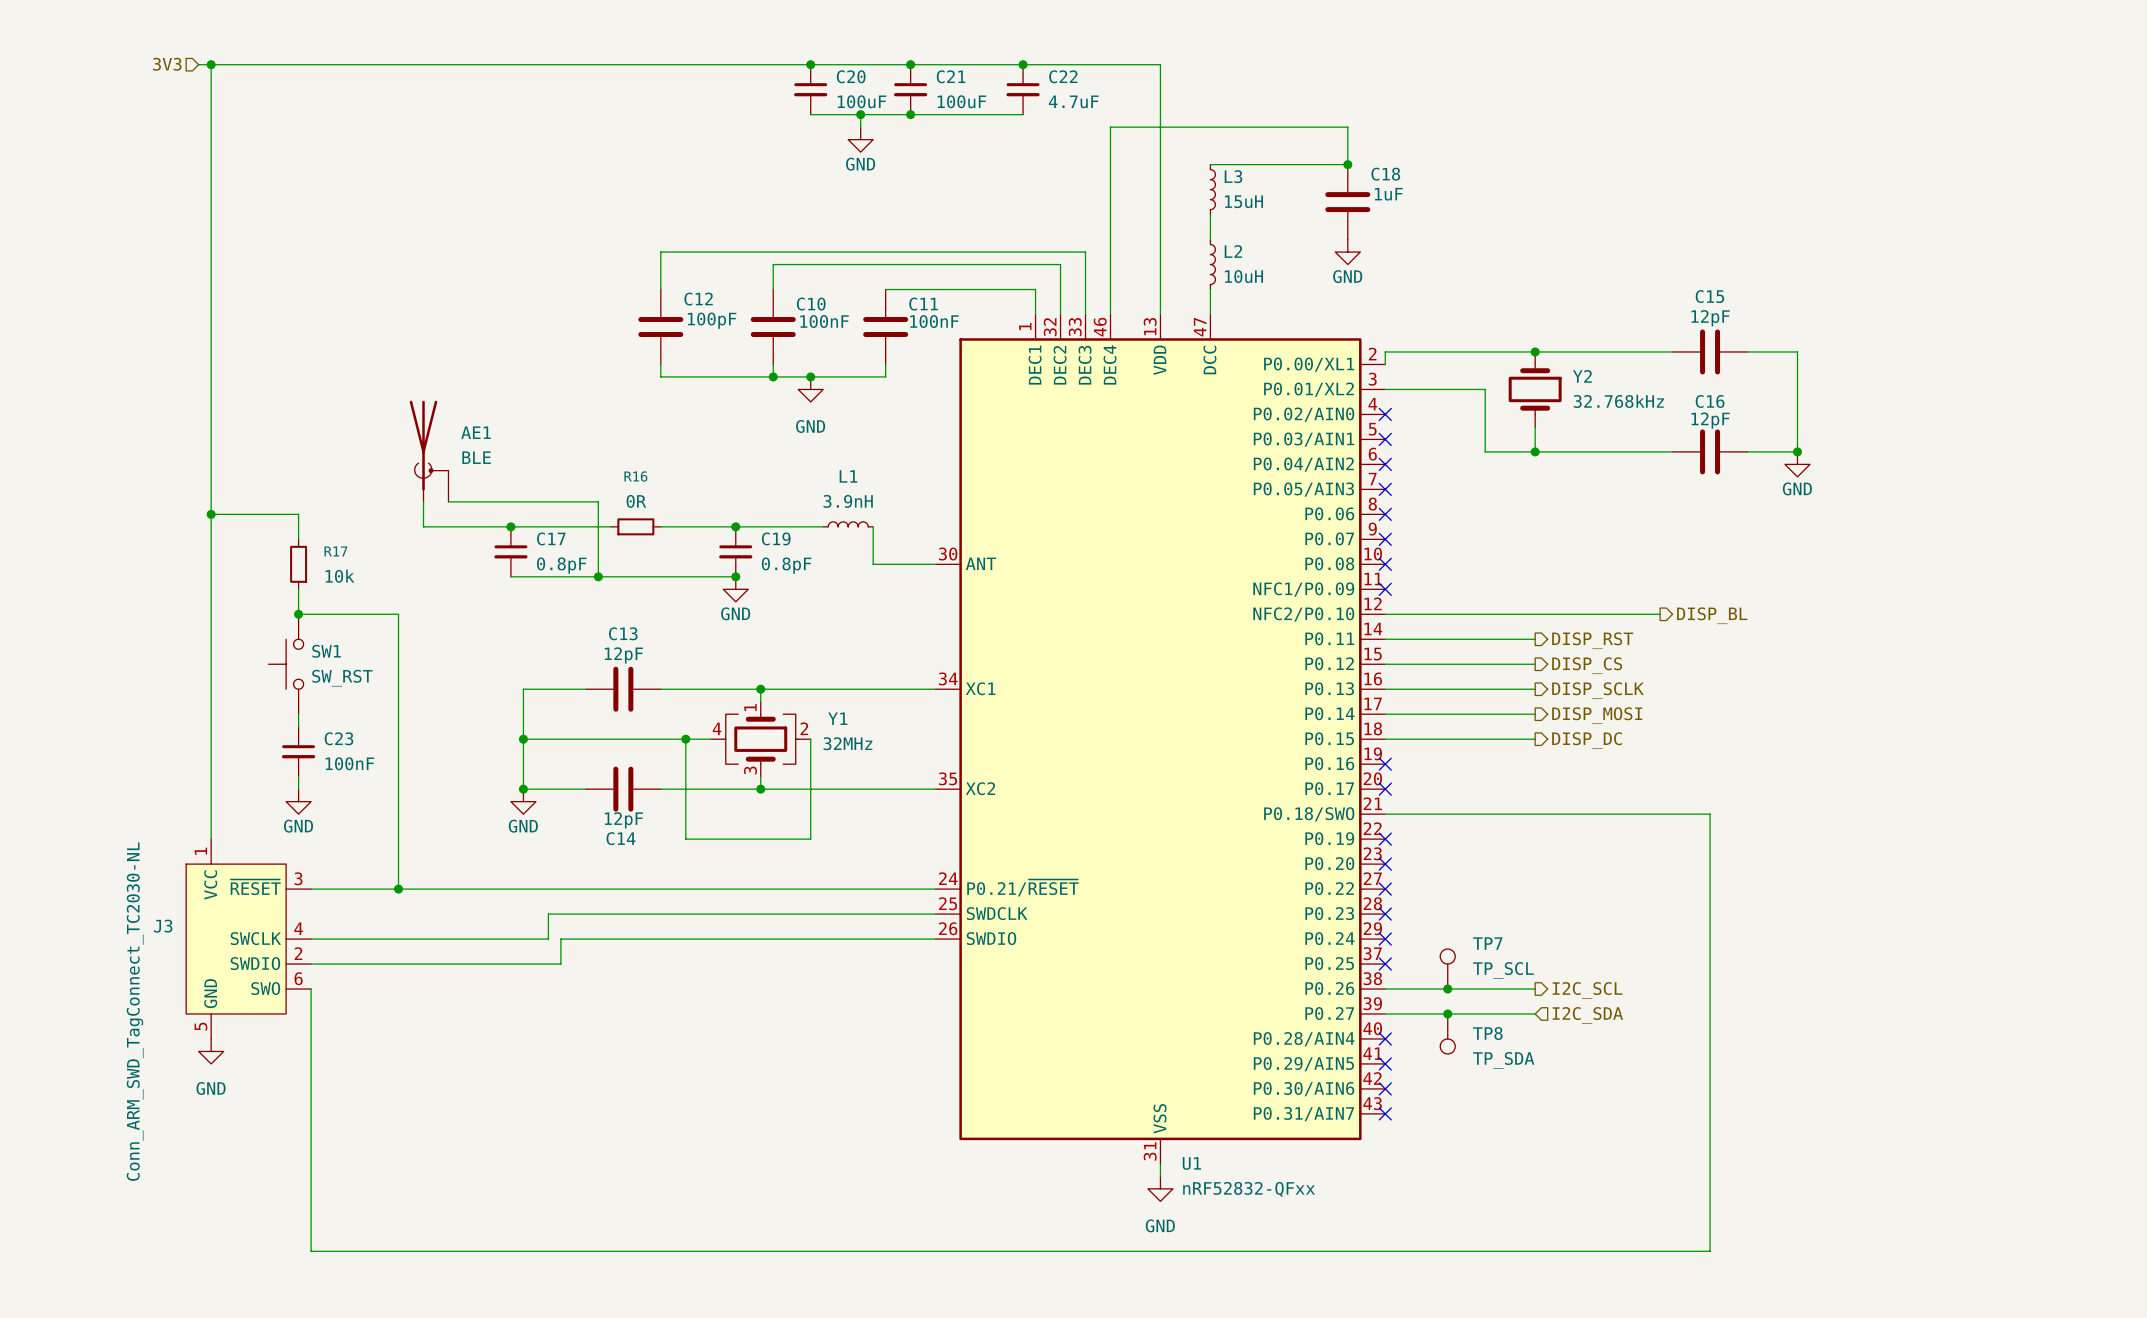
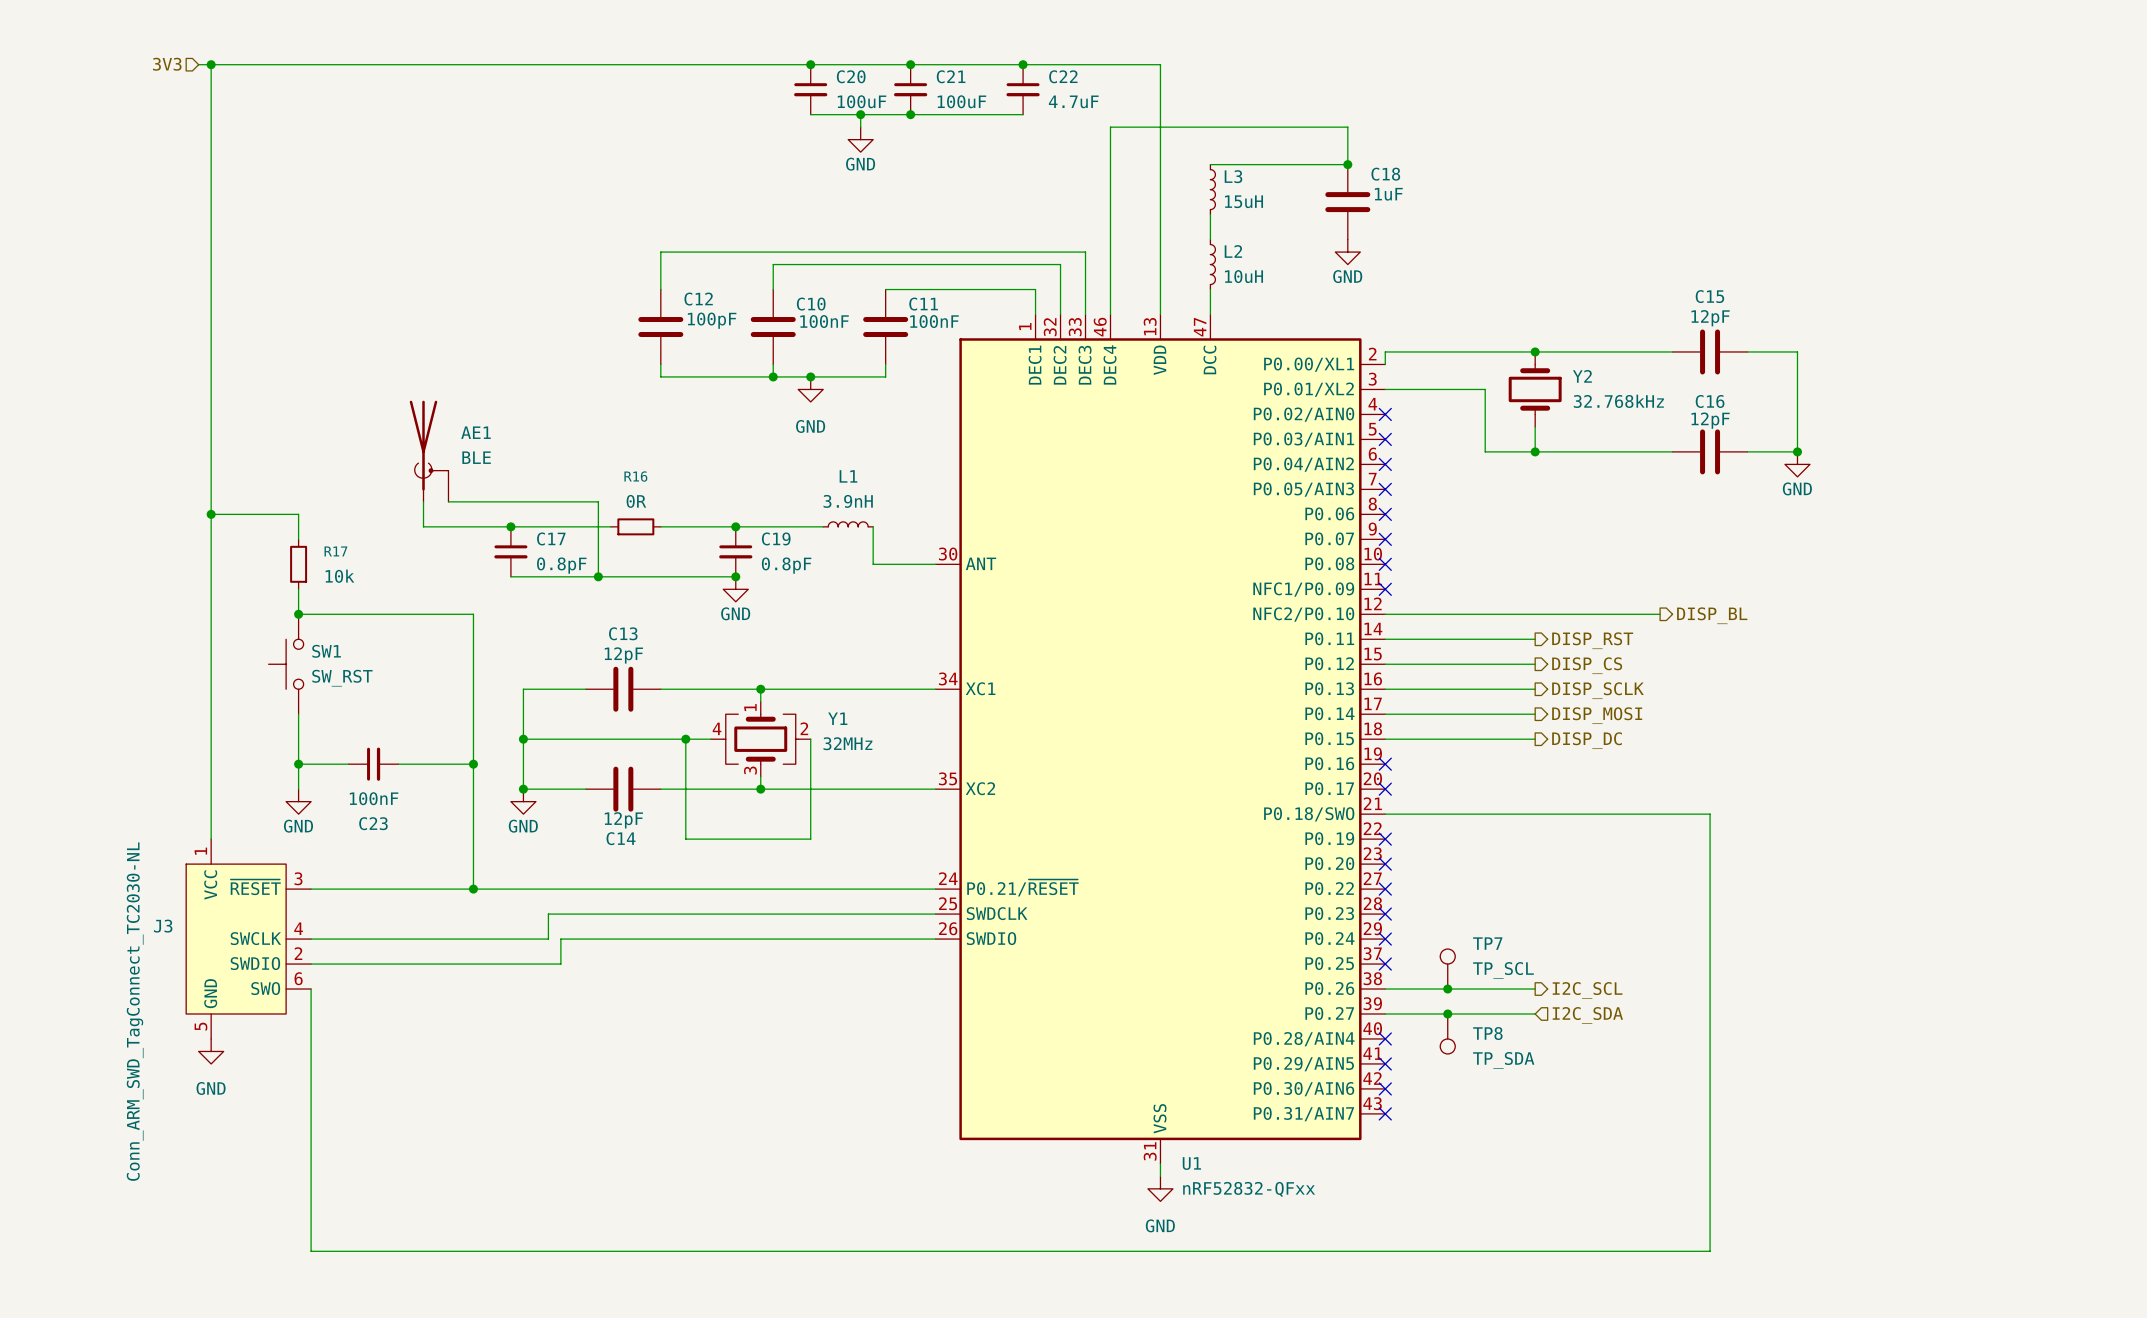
wire: (398, 614) (398, 889) -> (398, 614) (473, 614) (473, 889)
C23 name position: C23 (338, 738) -> C23 (373, 823)
C23 rotation: 0° (298, 751) -> 90° counterclockwise (373, 764)
C23 position: (298, 751) -> (373, 764)
C23 value position: 100nF (349, 763) -> 100nF (374, 798)
wire: none -> (298, 764) (348, 764)
junction: none -> (298, 764)
wire: none -> (398, 764) (473, 764)
junction: none -> (473, 764)
junction: (398, 889) -> none
junction: none -> (473, 889)

